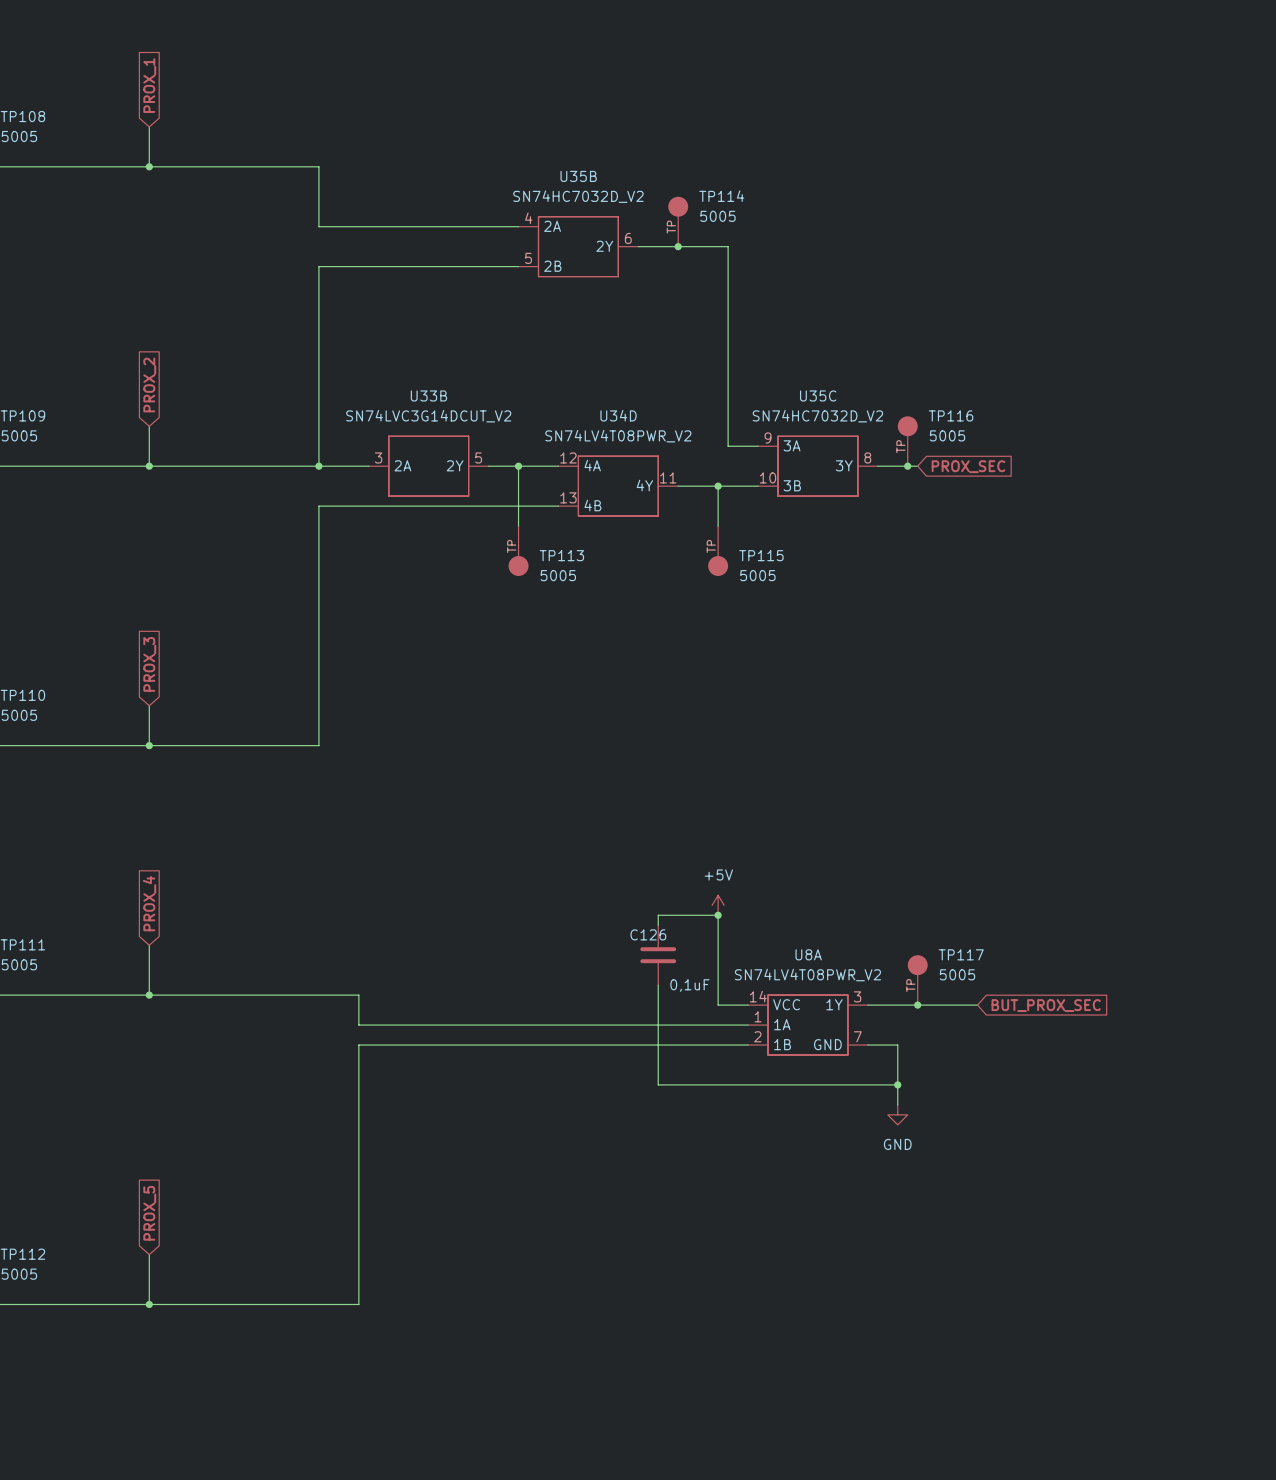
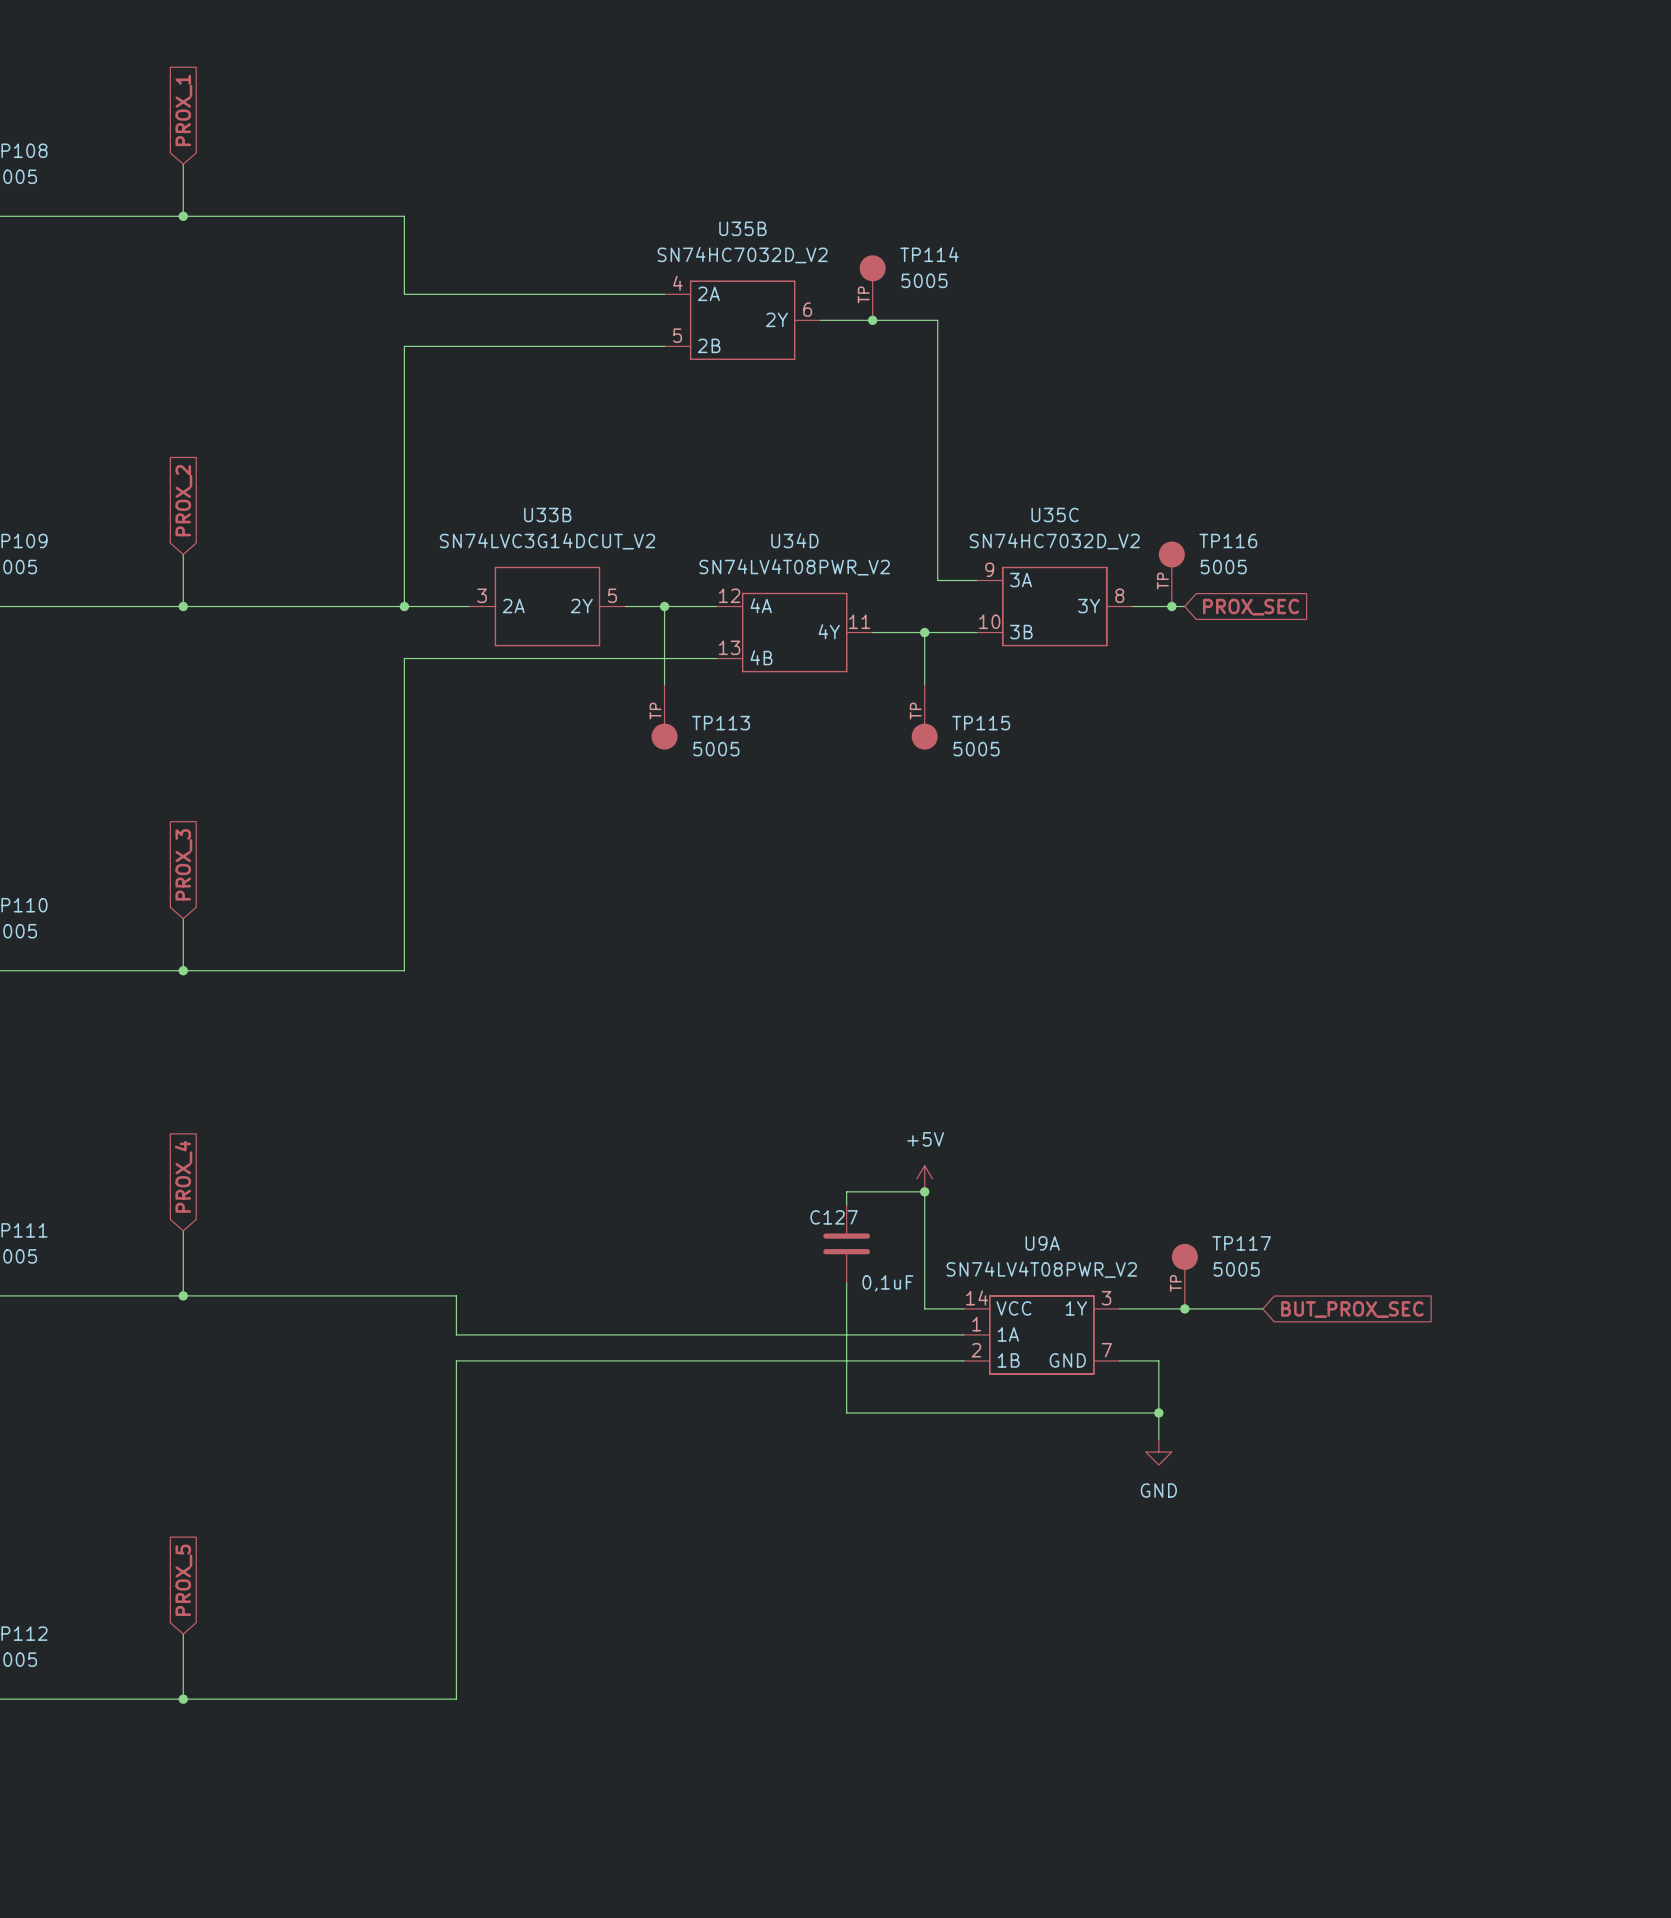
C126 name: C126 (648, 934) -> C127 (834, 1217)
U8A name: U8A (808, 954) -> U9A (1042, 1243)

